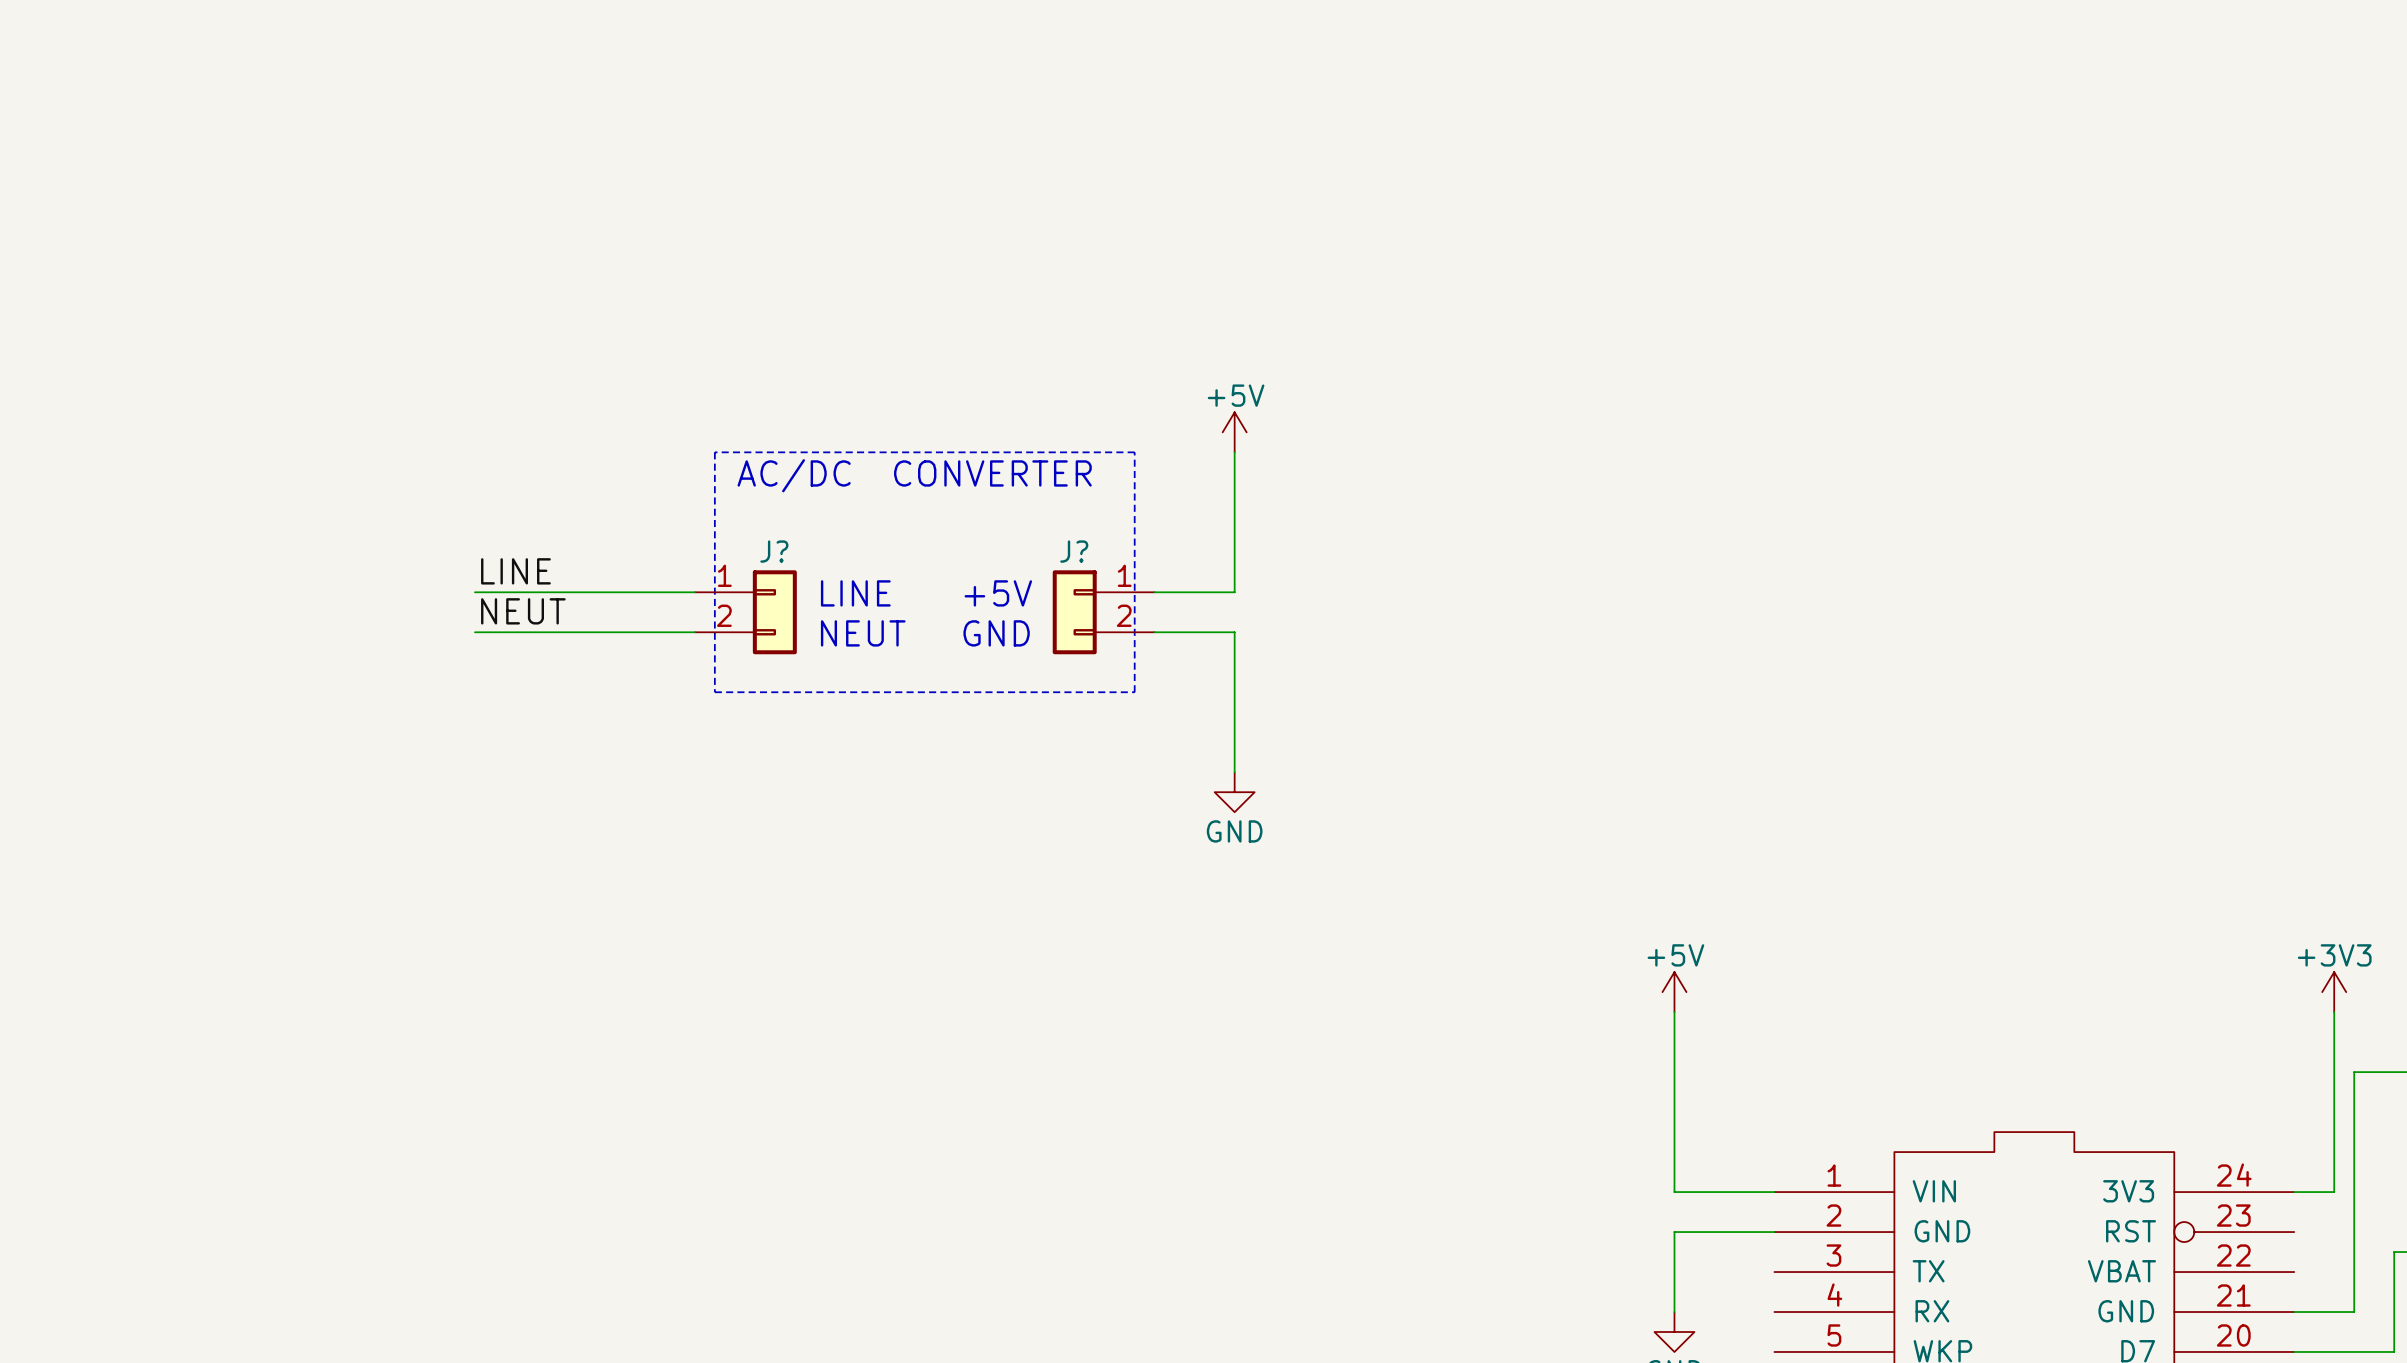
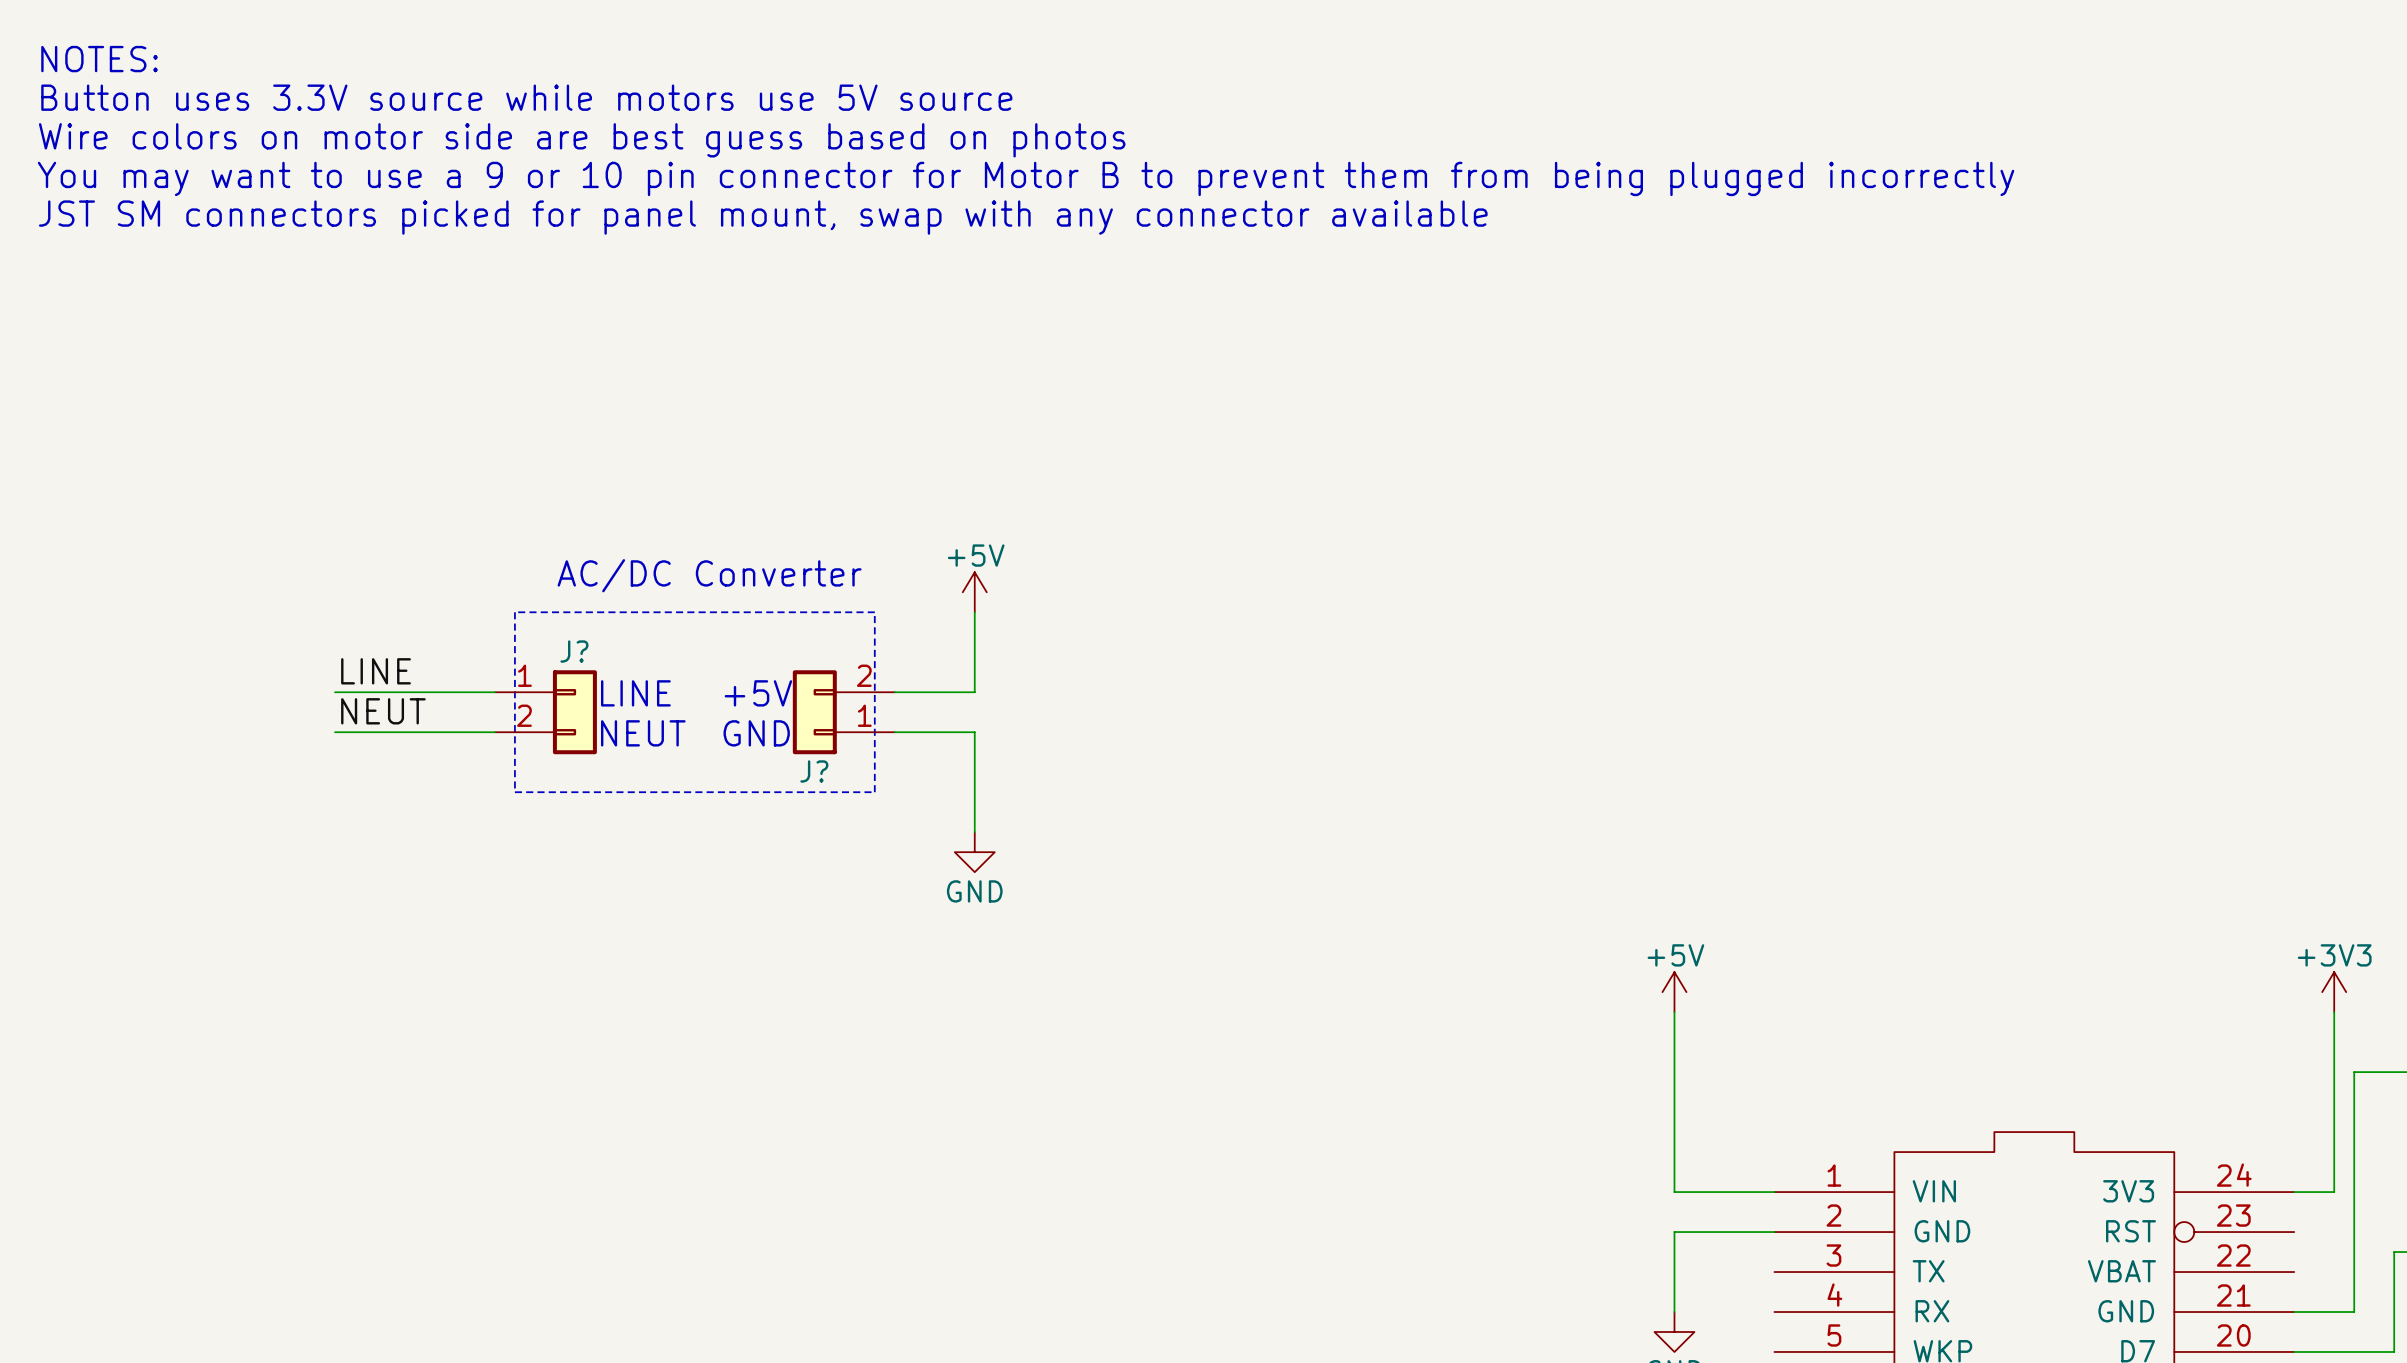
text: none -> NOTES: (99, 59)
text: none -> Button uses 3.3V source while motors use 5V source (526, 97)
text: none -> Wire colors on motor side are best guess based on photos (582, 140)
text: none -> You may want to use a 9 or 10 pin connector for Motor B to prevent them from being plugged incorrectly (1026, 178)
text: none -> JST SM connectors picked for panel mount, swap with any connector available (763, 217)
power symbol position: +5V (1234, 432) -> +5V (974, 592)
line: (714, 452) (714, 692) (1134, 692) (1134, 452) (714, 452) -> none
wire: (1234, 452) (1234, 592) (1154, 592) -> none
text: AC/DC CONVERTER (914, 475) -> none
label position: LINE (515, 571) -> LINE (376, 671)
text: none -> AC/DC Converter (709, 575)
wire: (474, 592) (694, 592) -> none
text position: LINE (855, 593) -> LINE (635, 693)
text position: +5V (998, 593) -> +5V (758, 693)
label position: NEUT (523, 611) -> NEUT (383, 711)
line: none -> (514, 612) (514, 792) (874, 792) (874, 612) (514, 612)
J?: (745, 612) -> none
wire: none -> (974, 612) (974, 692) (894, 692)
J?: (1103, 612) -> none
wire: (474, 632) (694, 632) -> none
wire: (1154, 632) (1234, 632) (1234, 772) -> none
text position: NEUT (863, 633) -> NEUT (643, 733)
text position: GND (996, 633) -> GND (756, 733)
wire: none -> (335, 692) (494, 692)
J?: none -> (545, 712)
J?: none -> (843, 712)
wire: none -> (335, 732) (494, 732)
wire: none -> (894, 732) (974, 732) (974, 832)
power symbol position: GND (1234, 792) -> GND (974, 852)

